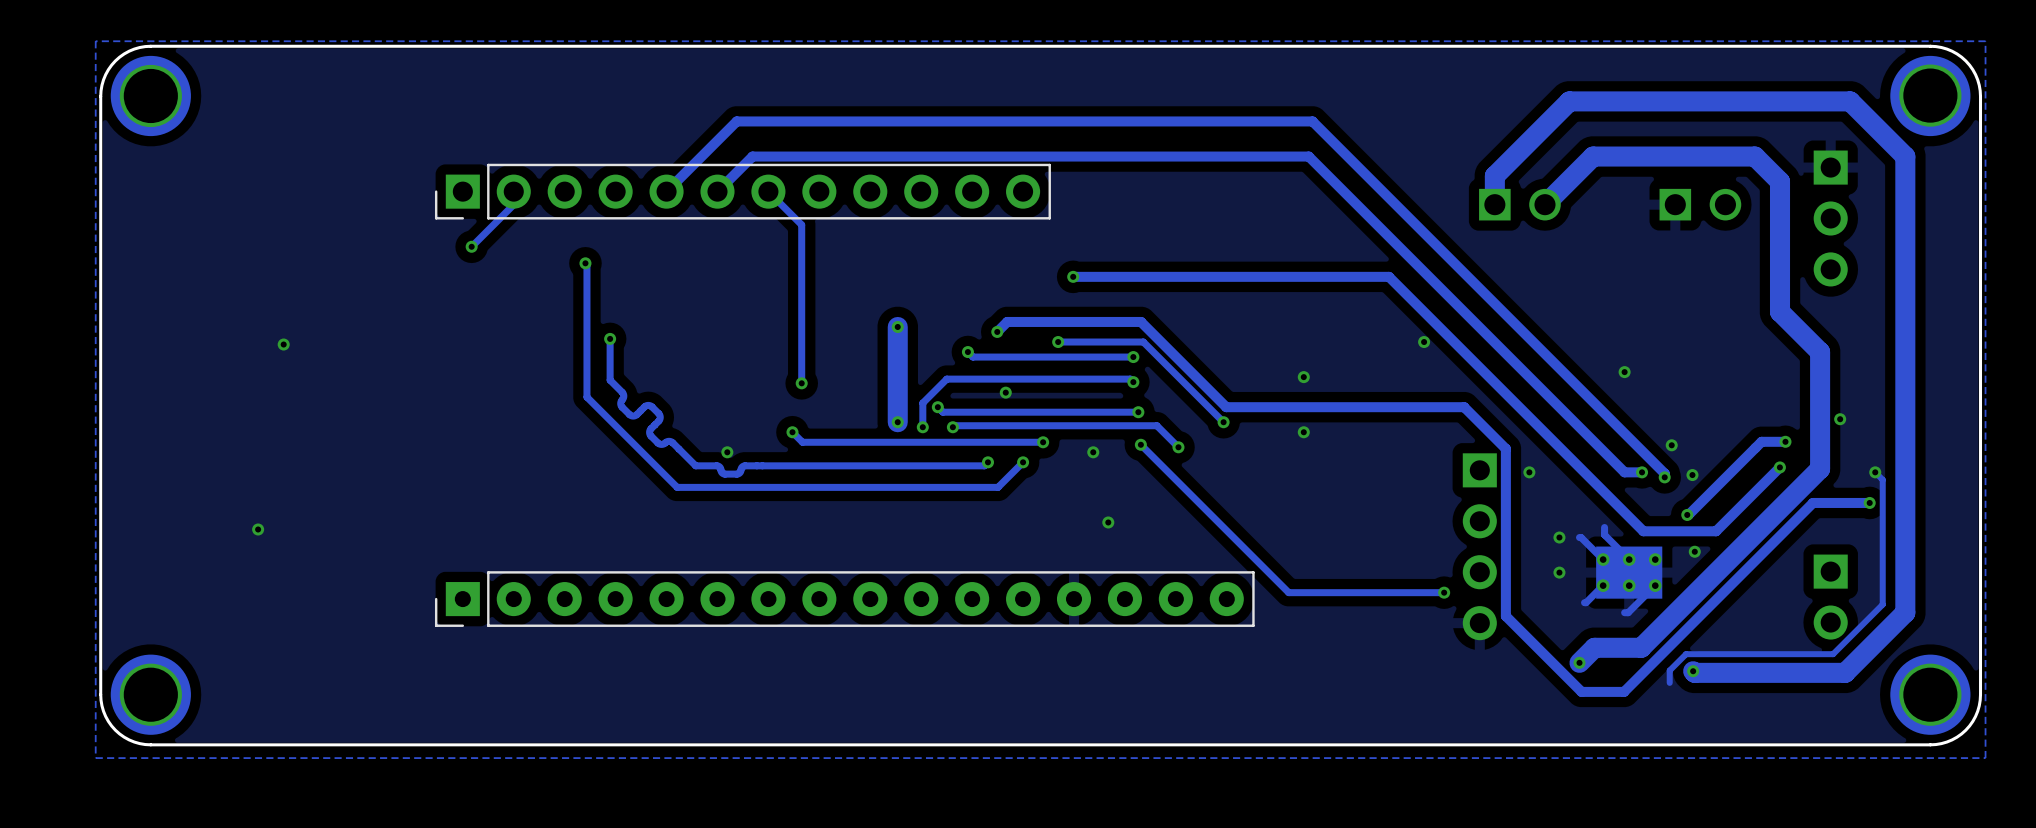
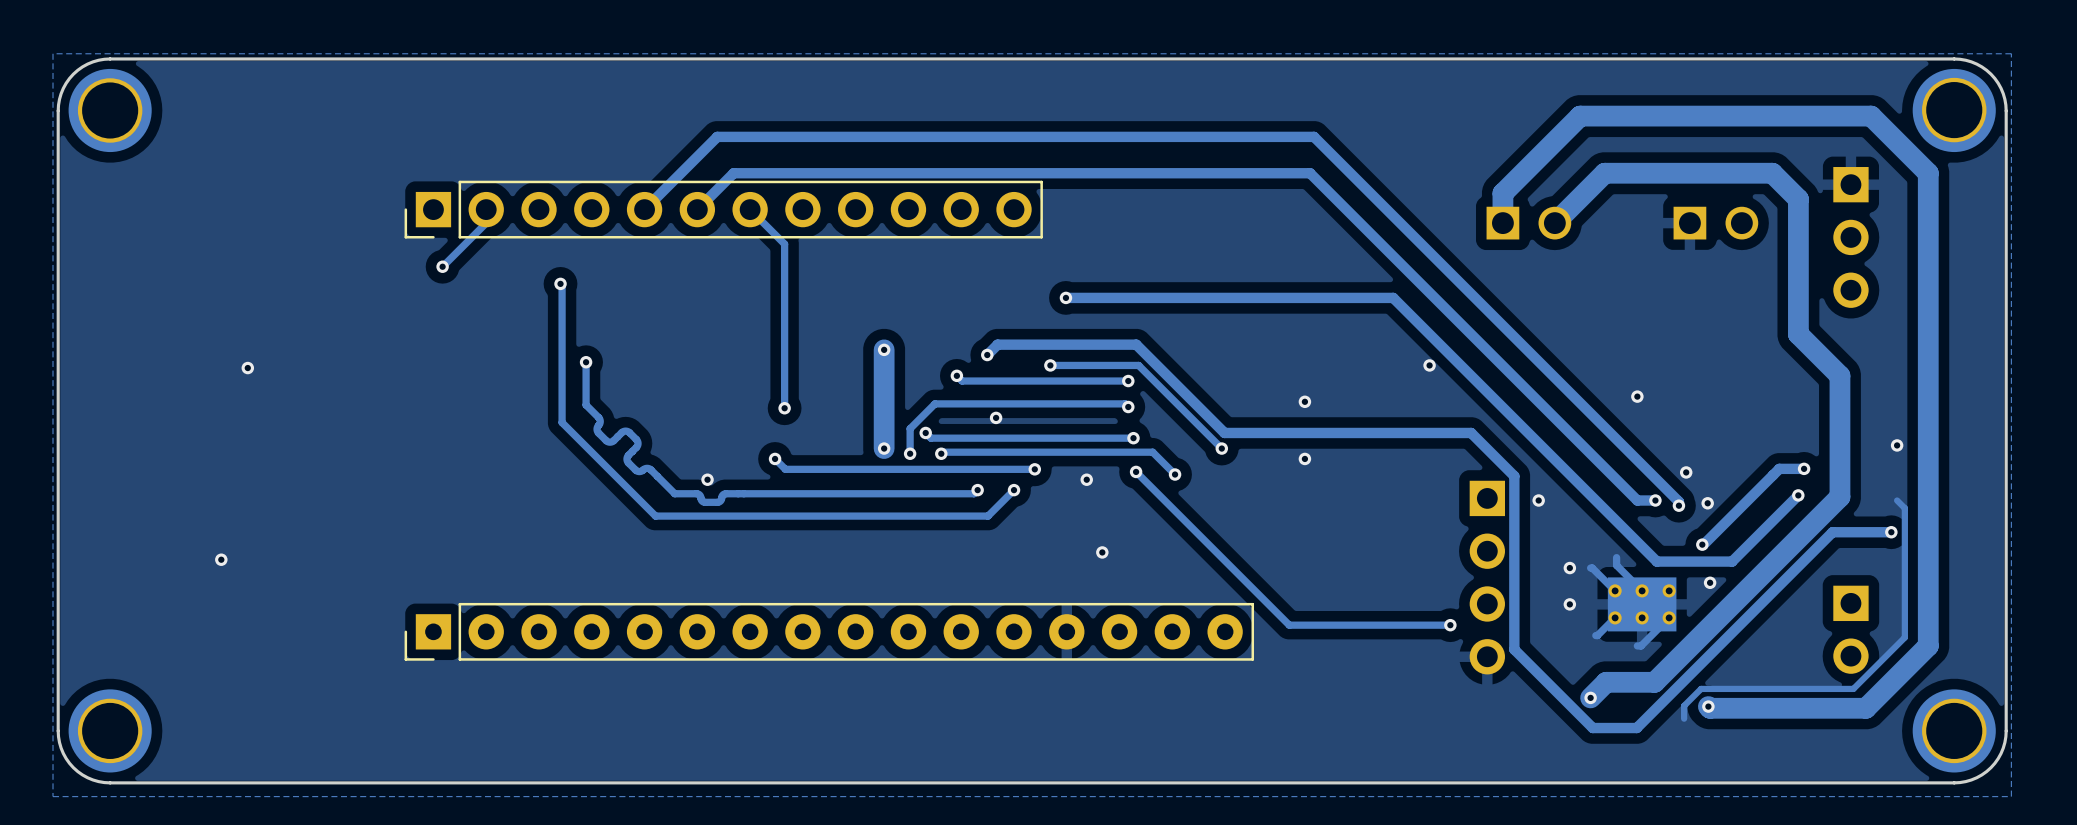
via: (1840, 419) -> none
via: none -> (1897, 445)
via: (1875, 472) -> none

